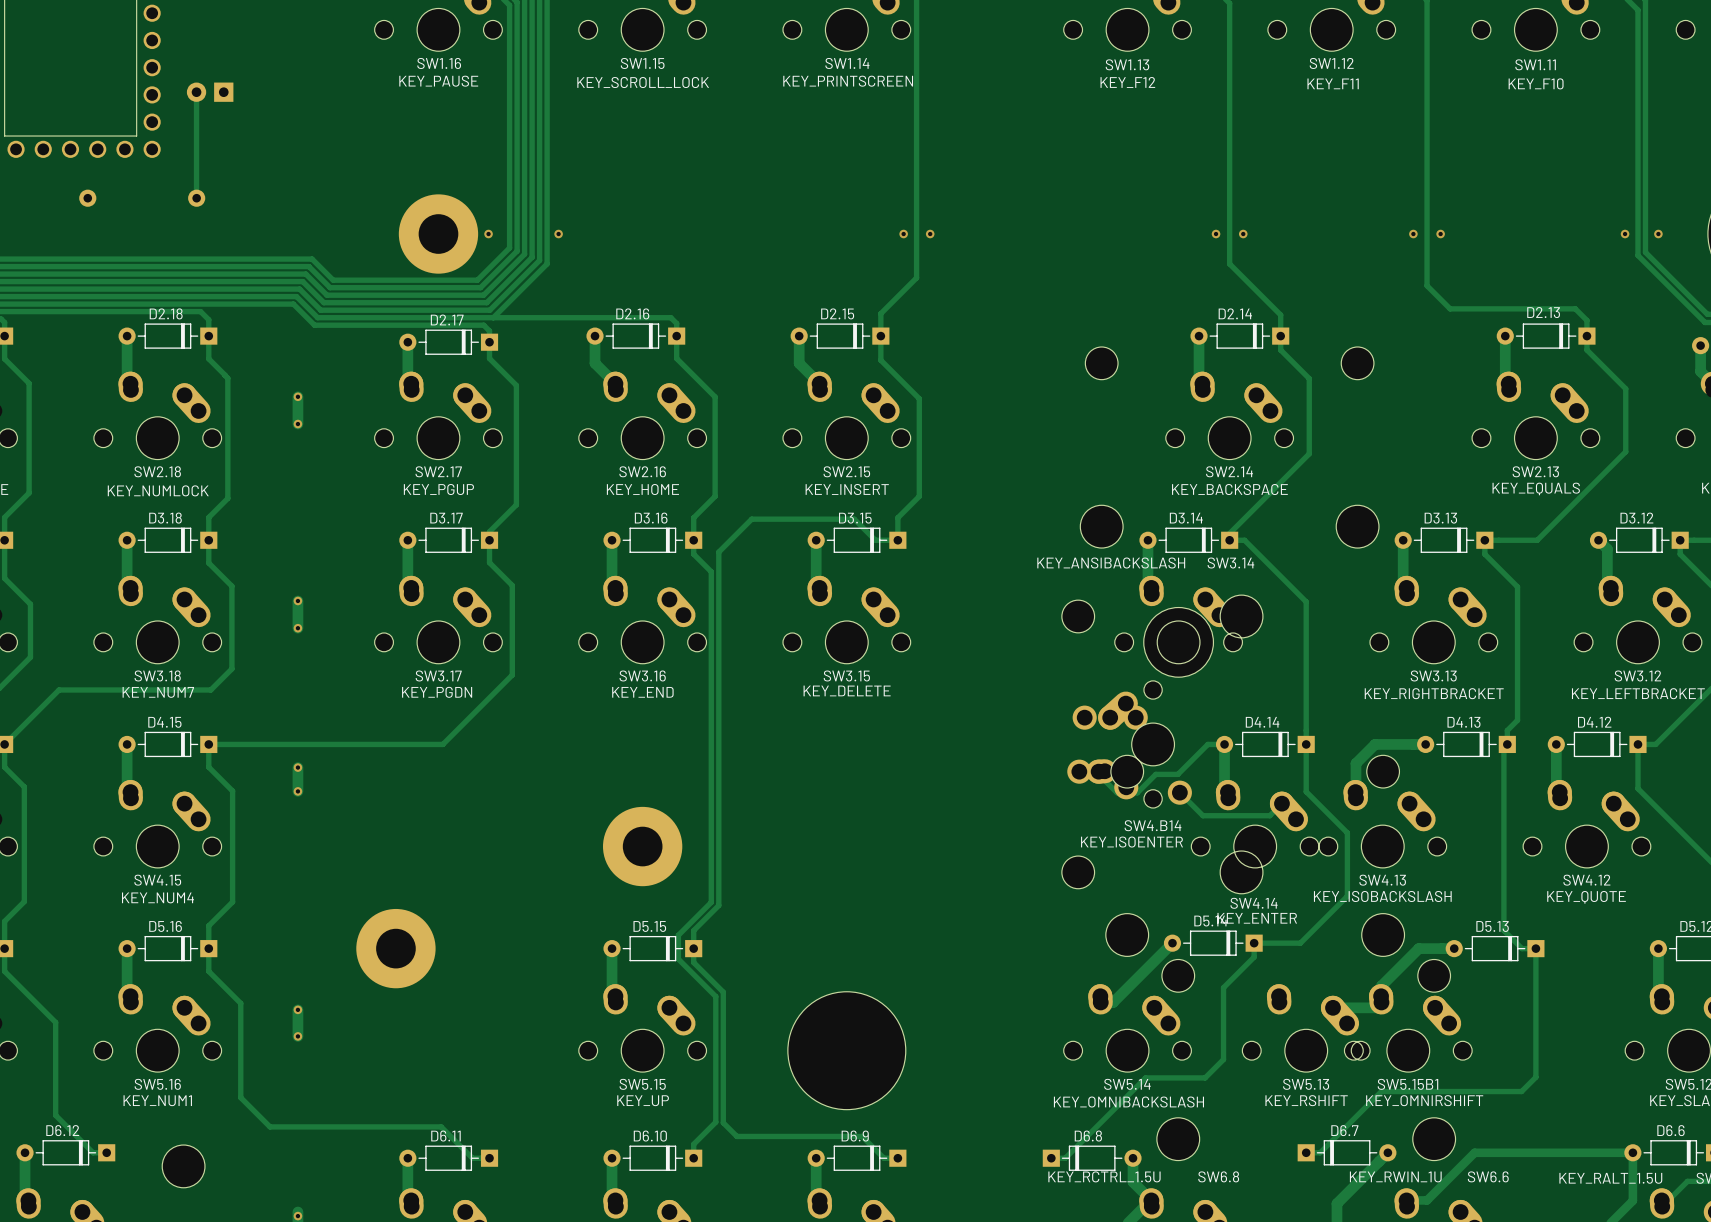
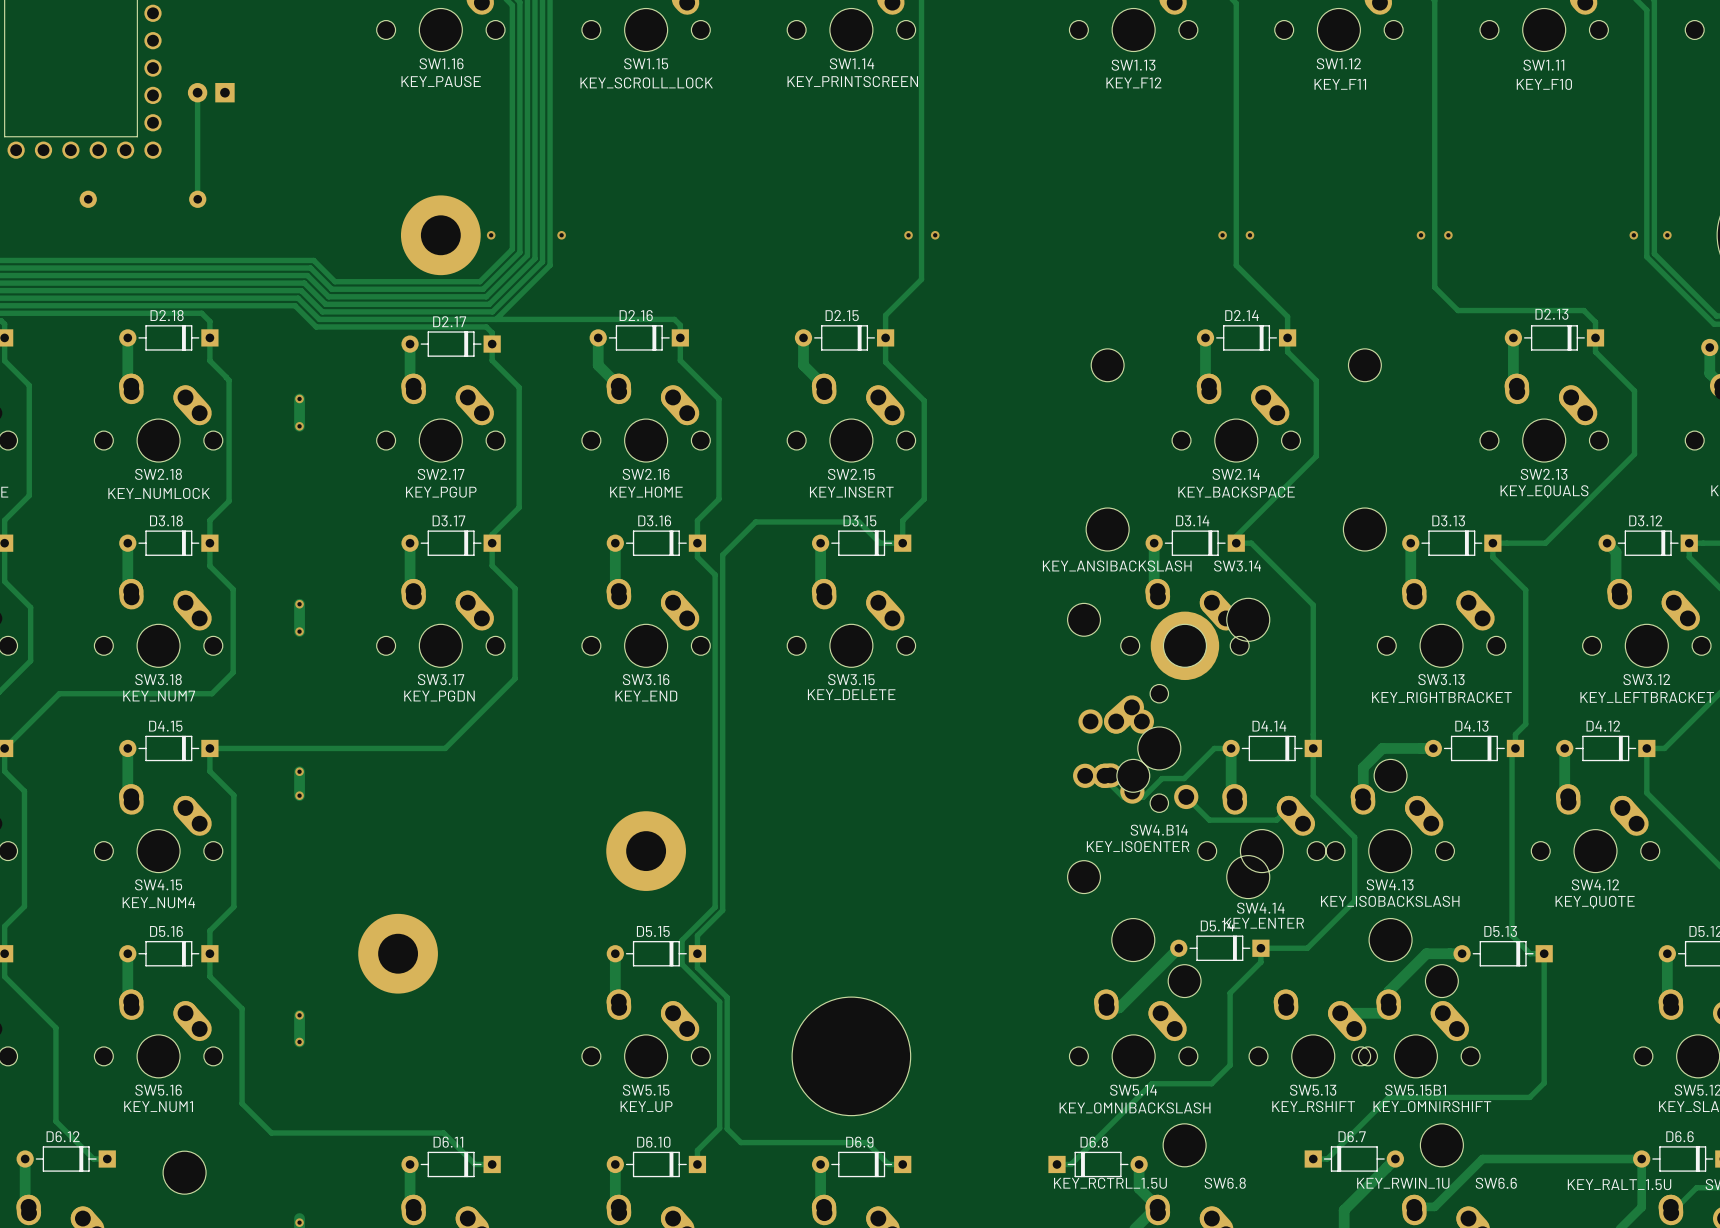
SW4.14 footprint: [1105, 607, 1405, 957] -> [1111, 611, 1413, 962]

